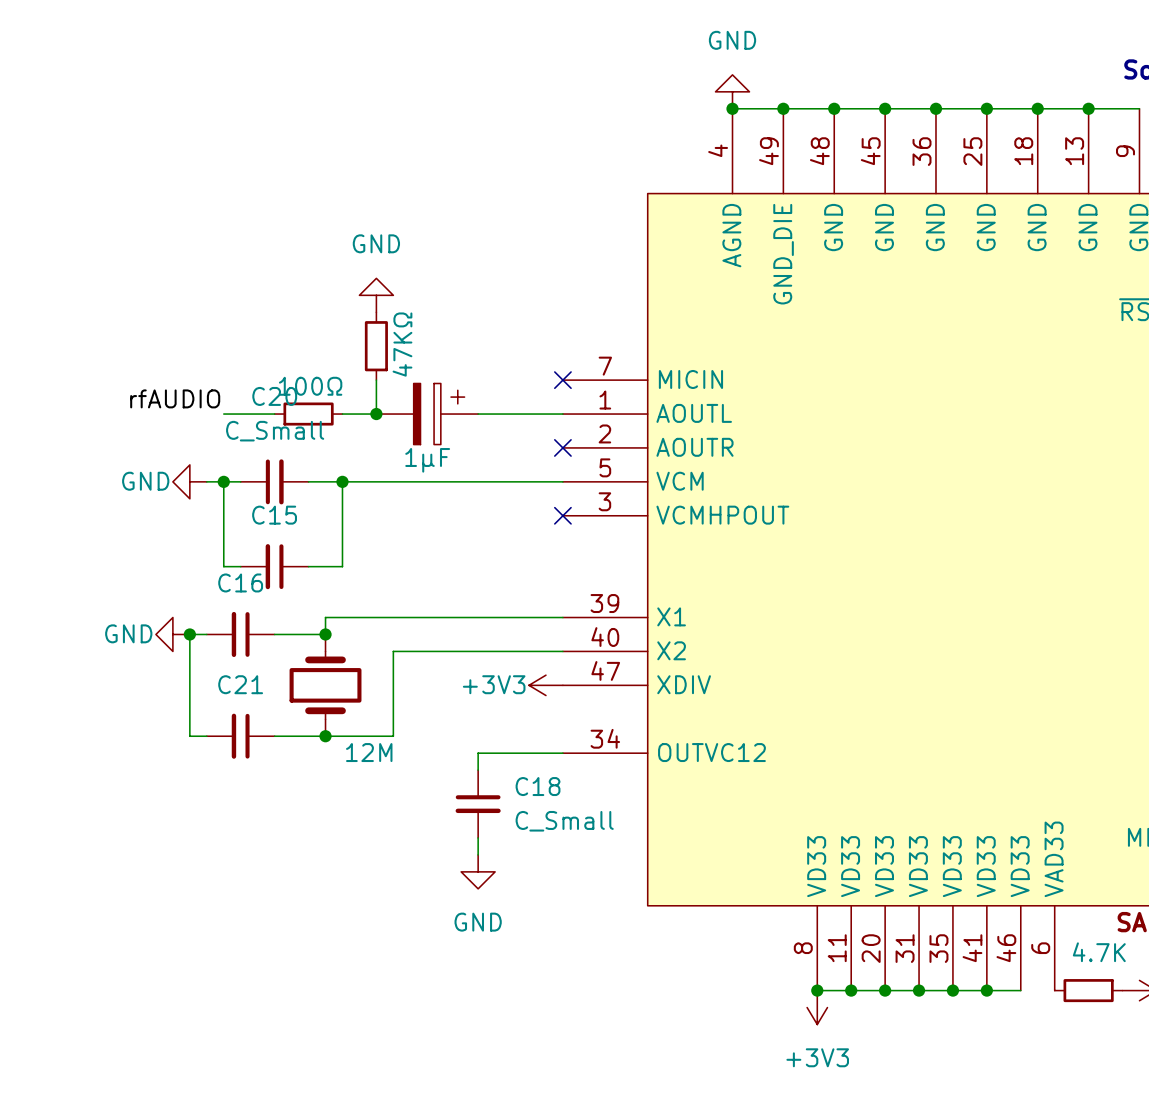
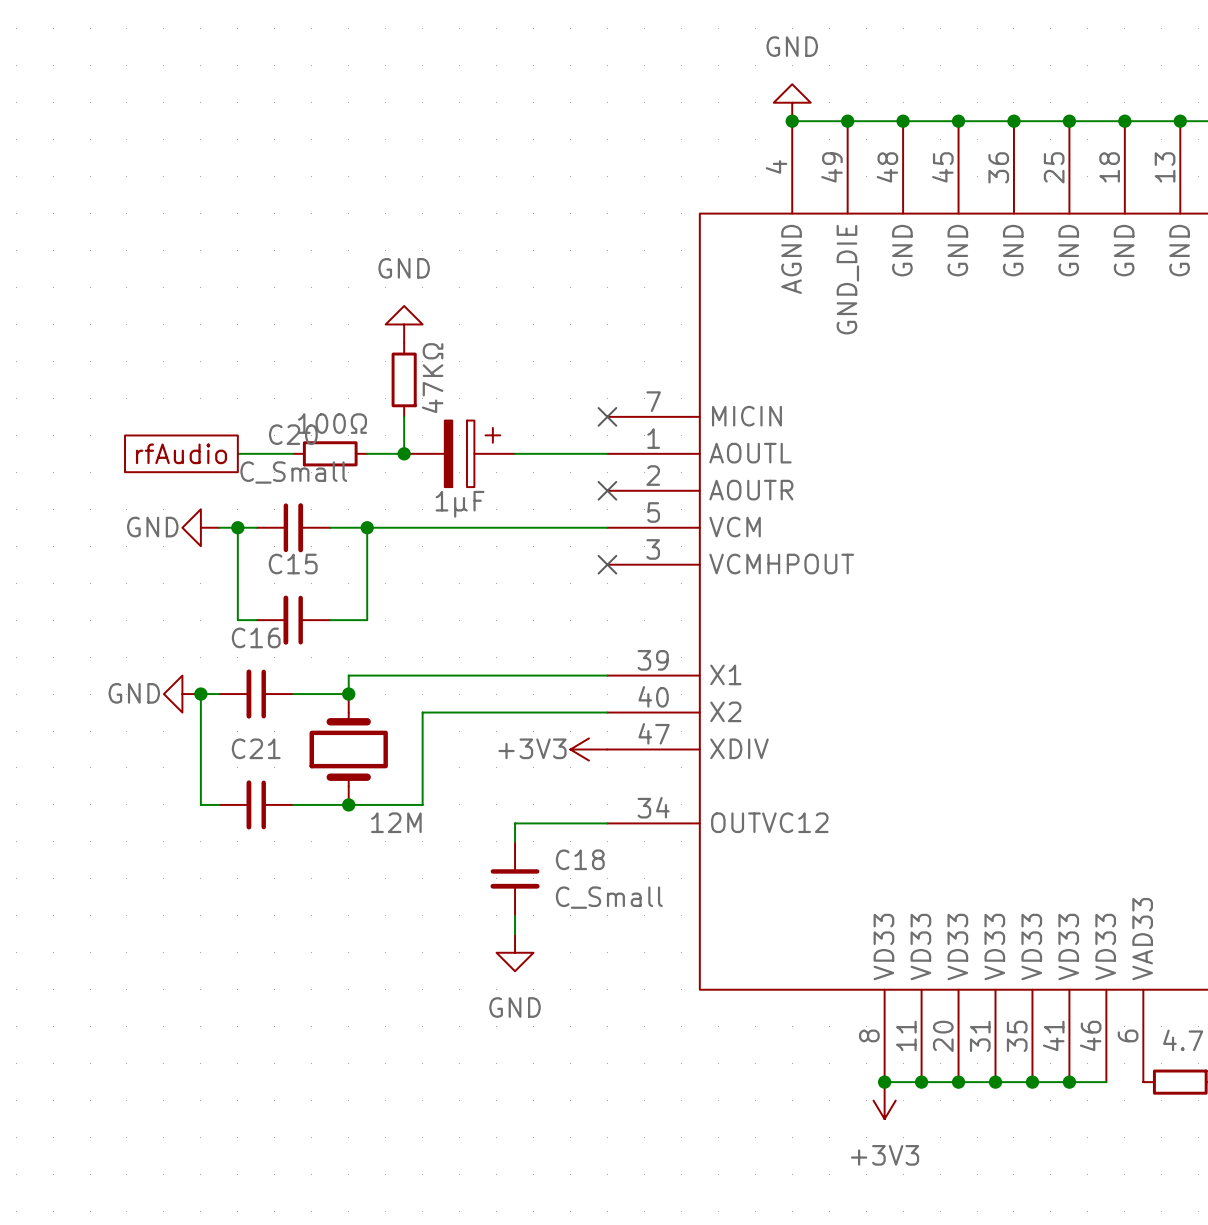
label: rfAUDIO (175, 398) -> none
global label: none -> rfAudio (181, 453)

